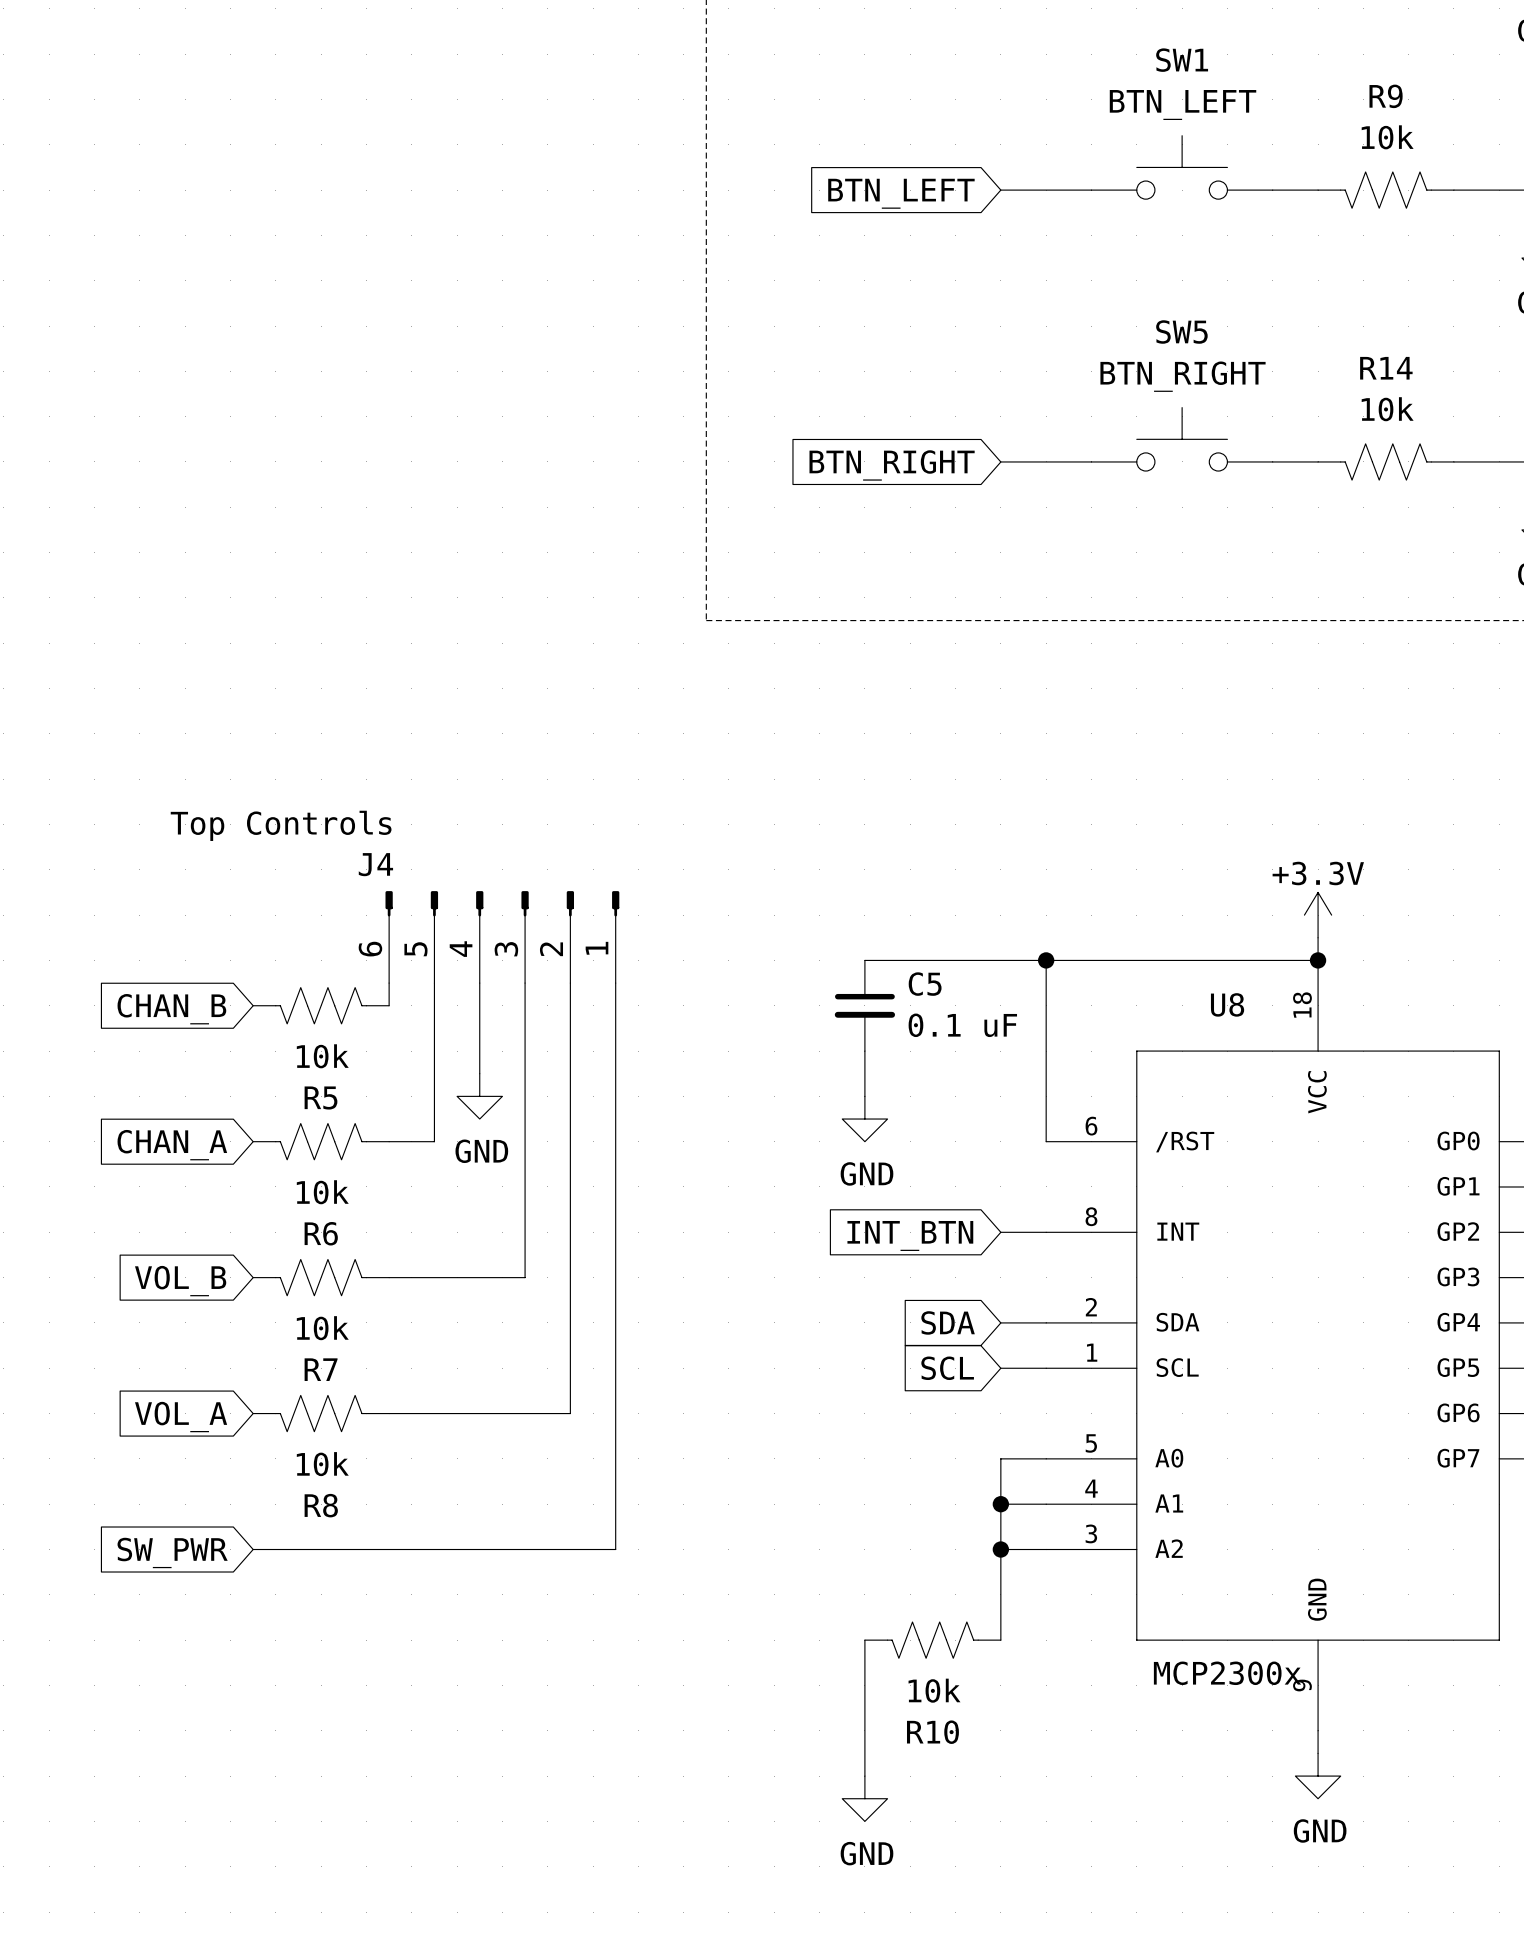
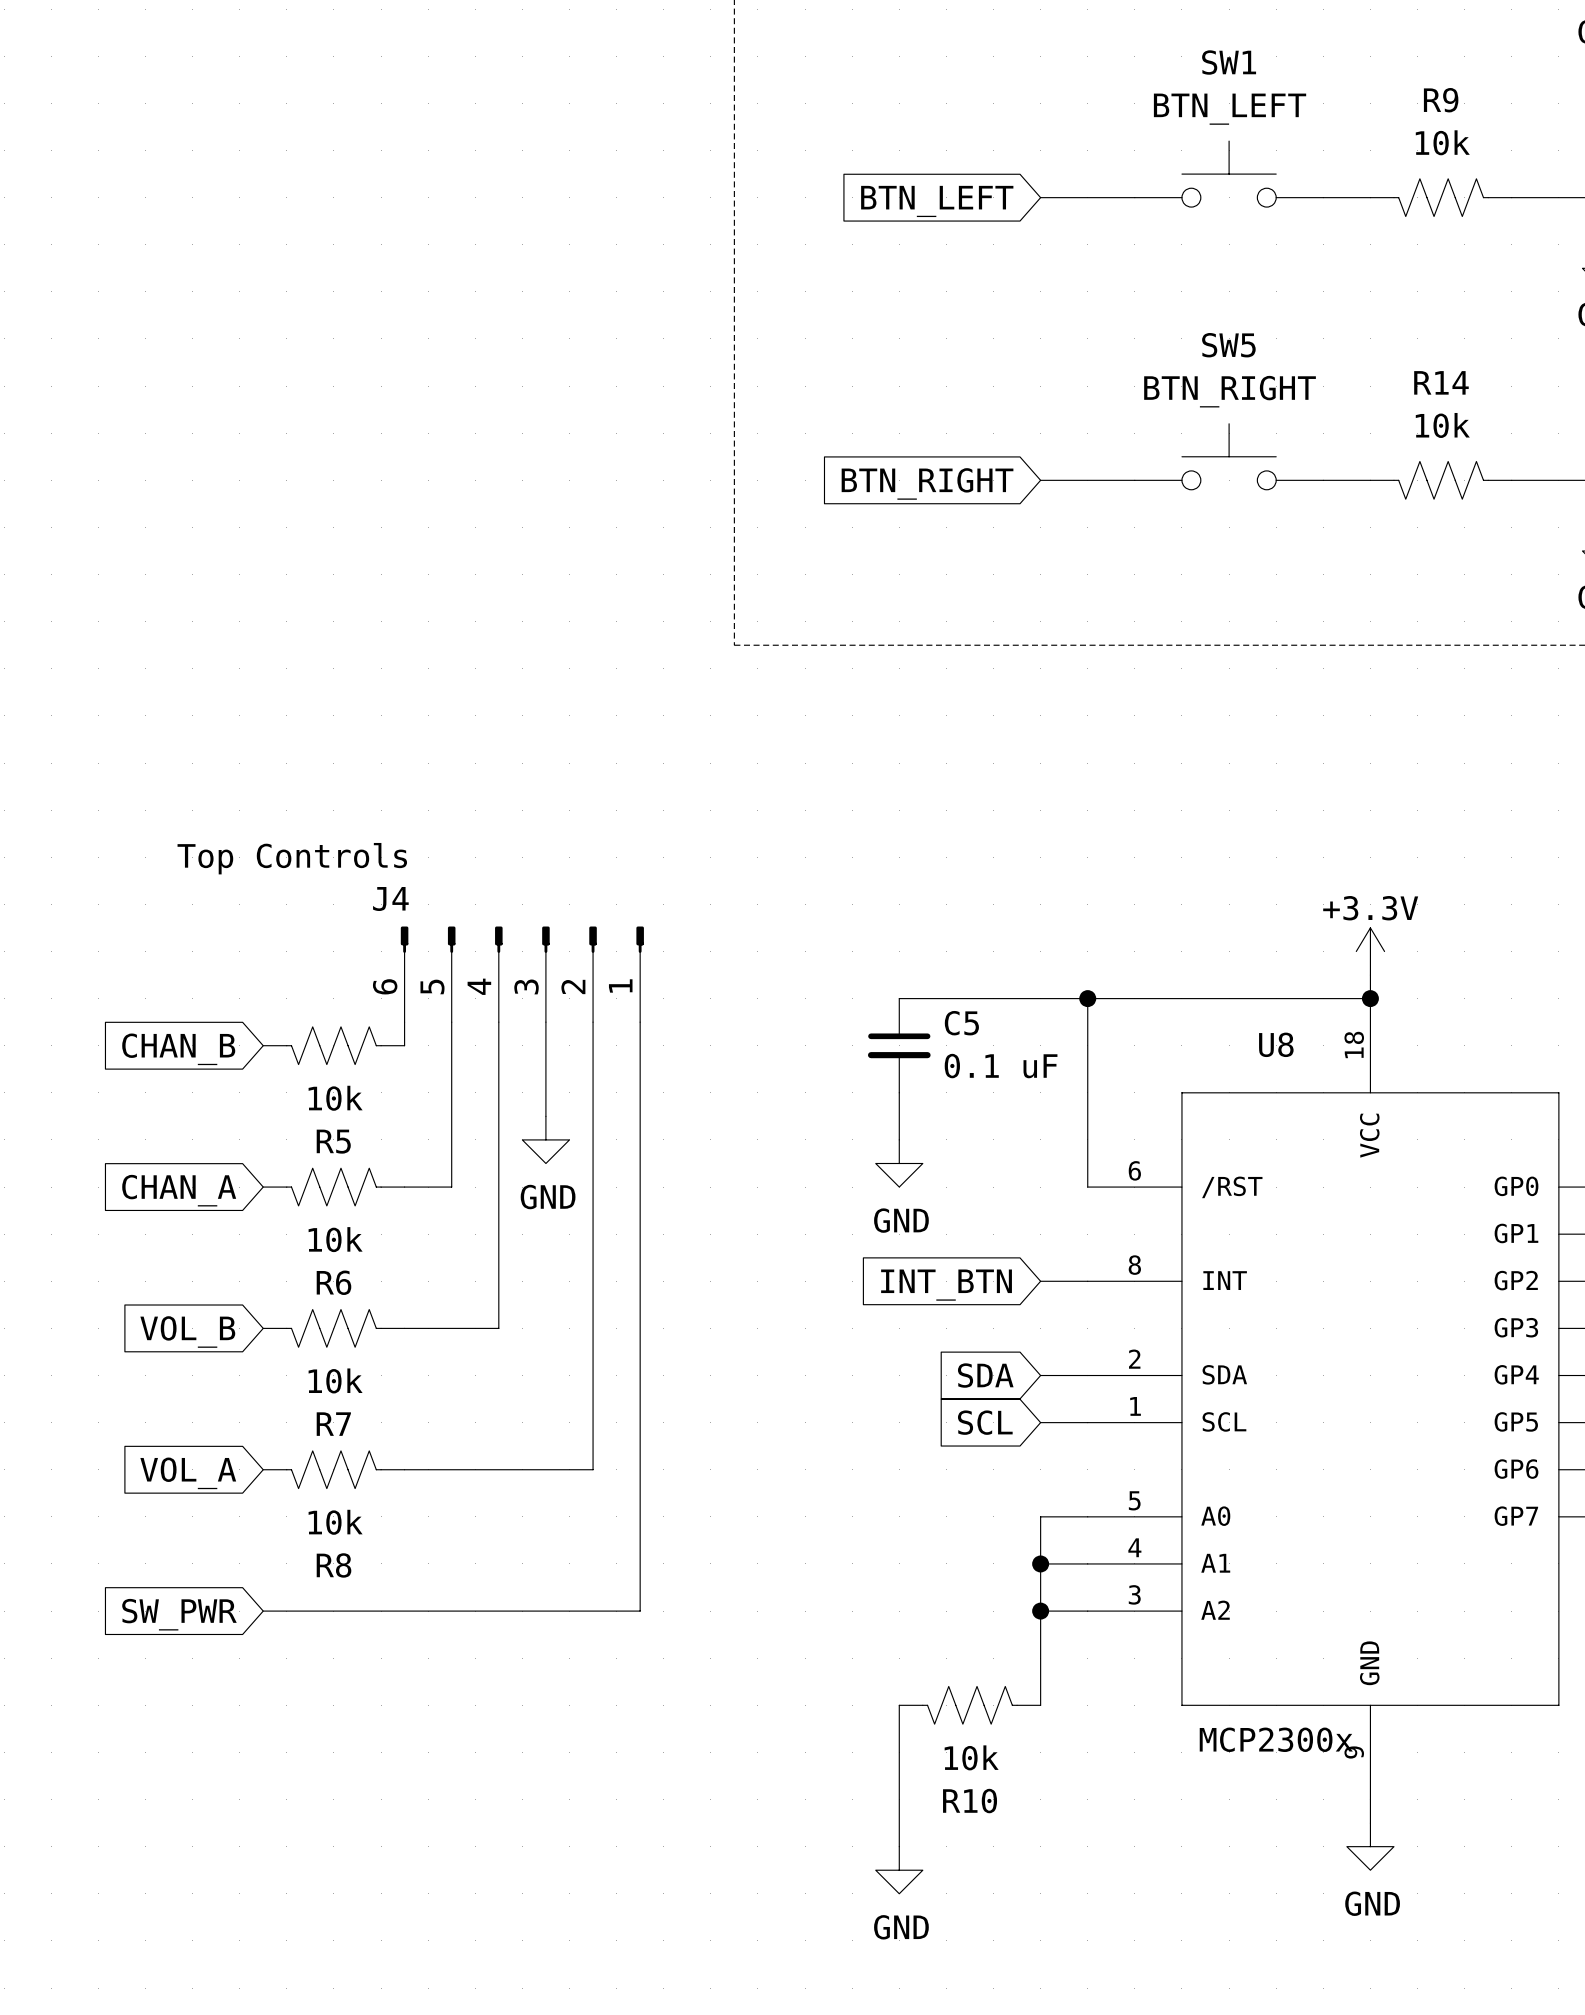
wire: (525, 1073) (525, 1277) (479, 1277) -> (498, 1116) (498, 1328)
power symbol position: GND (479, 1096) -> GND (545, 1139)

